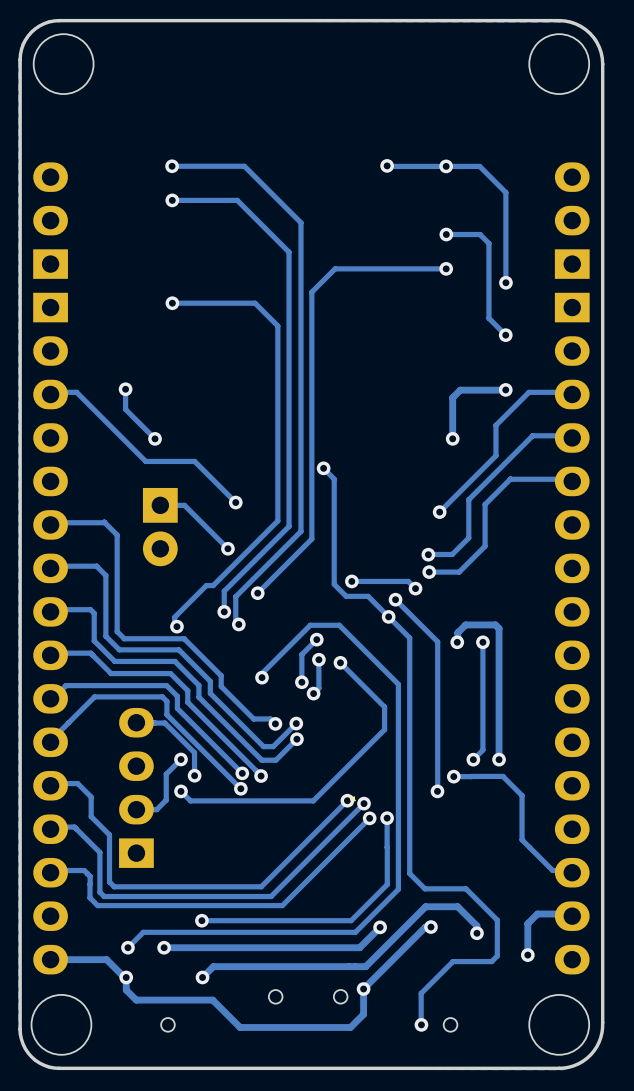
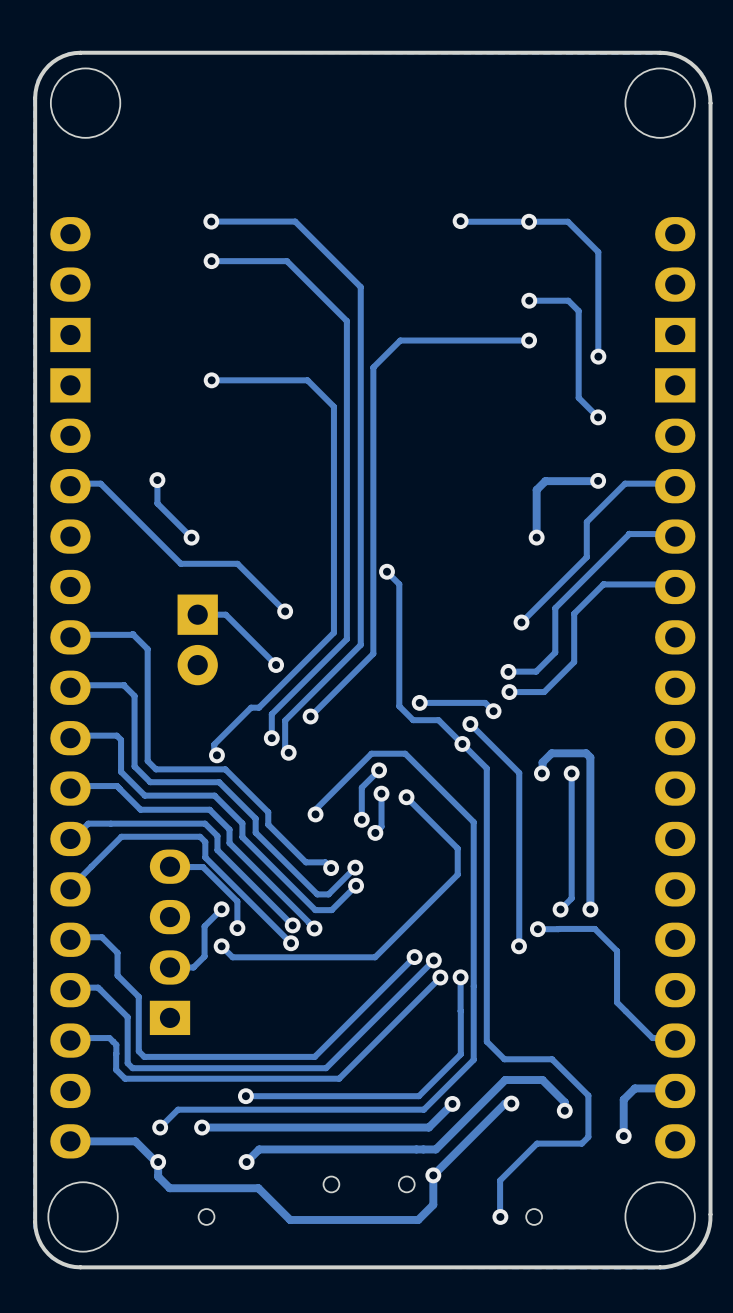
part: (352, 798) -> none

